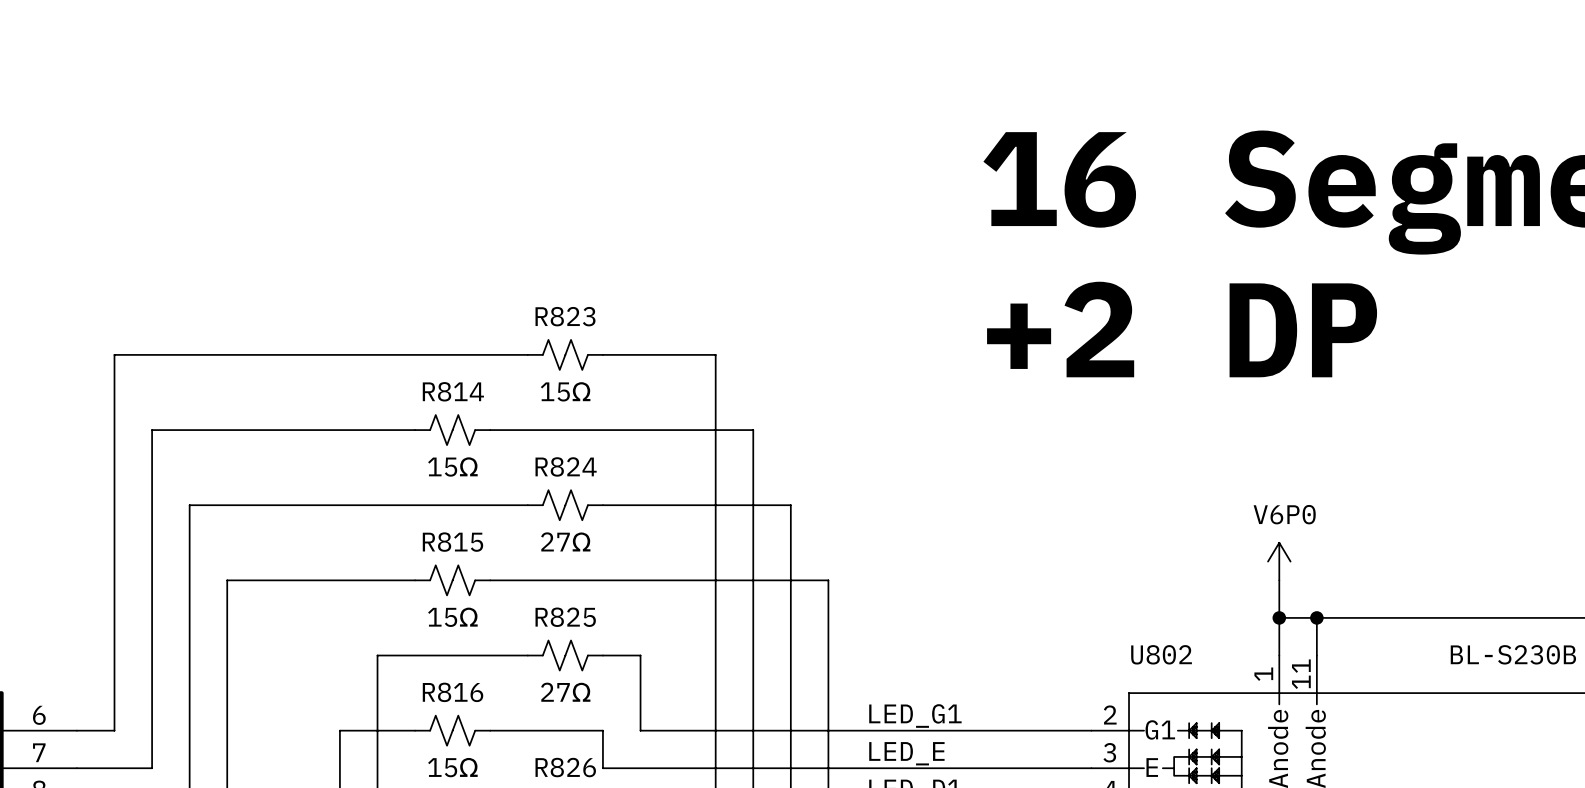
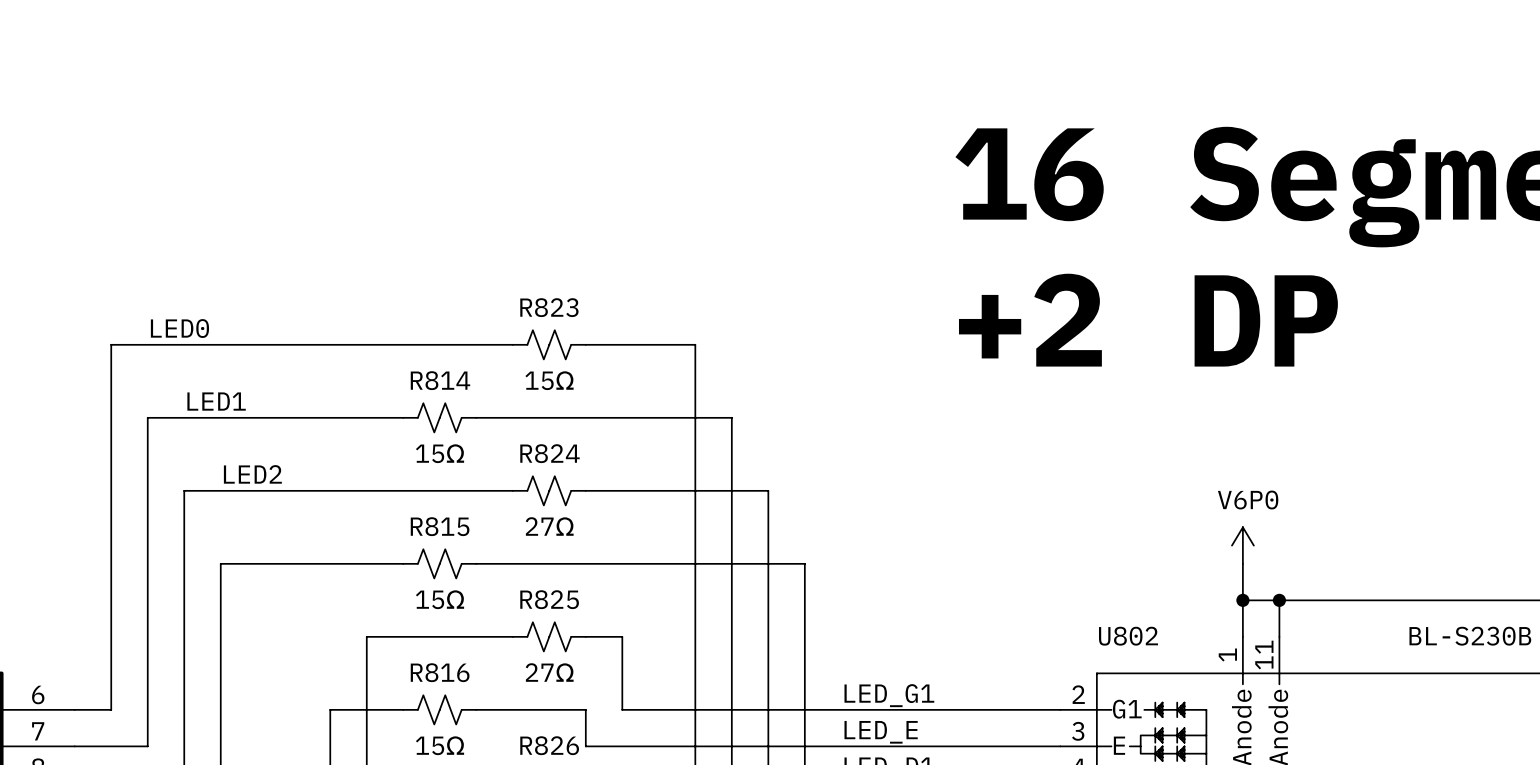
label: none -> LED0 (179, 328)
label: none -> LED1 (216, 401)
label: none -> LED2 (252, 474)

